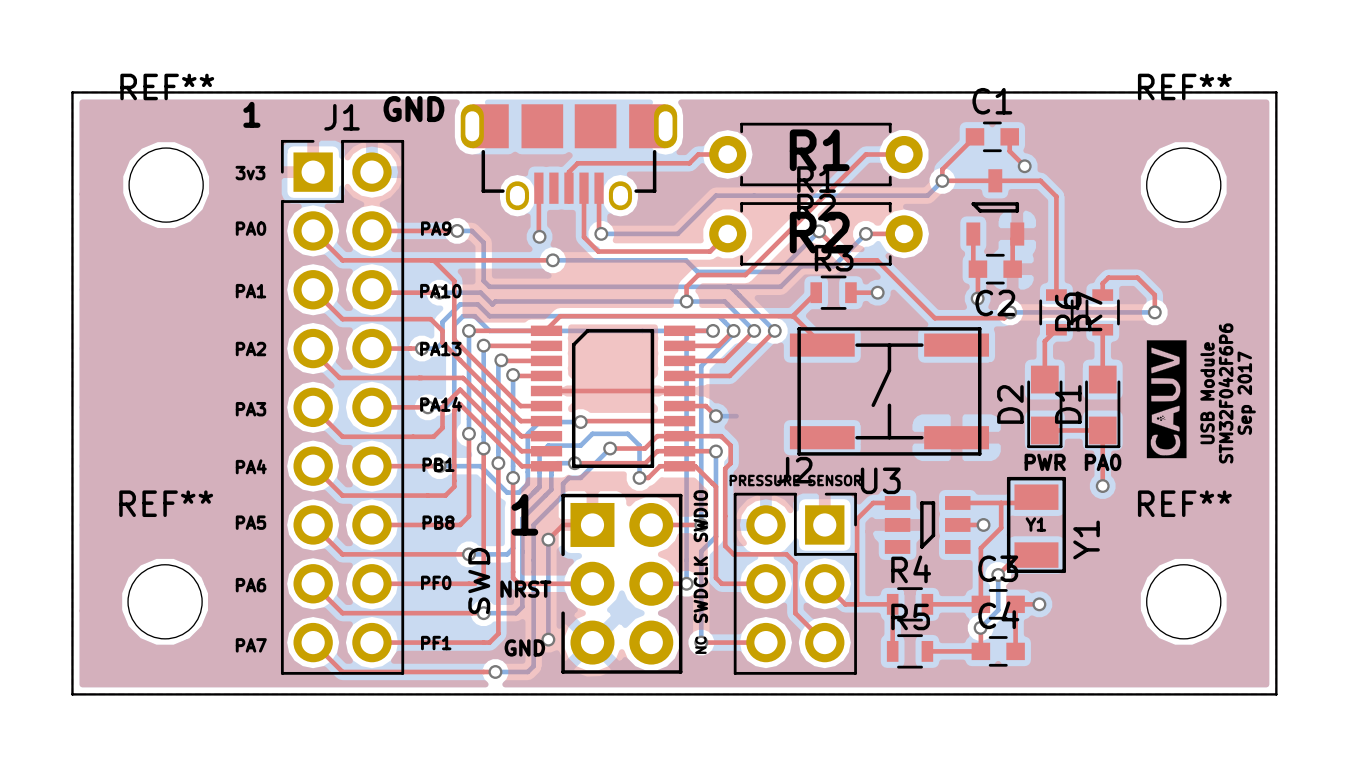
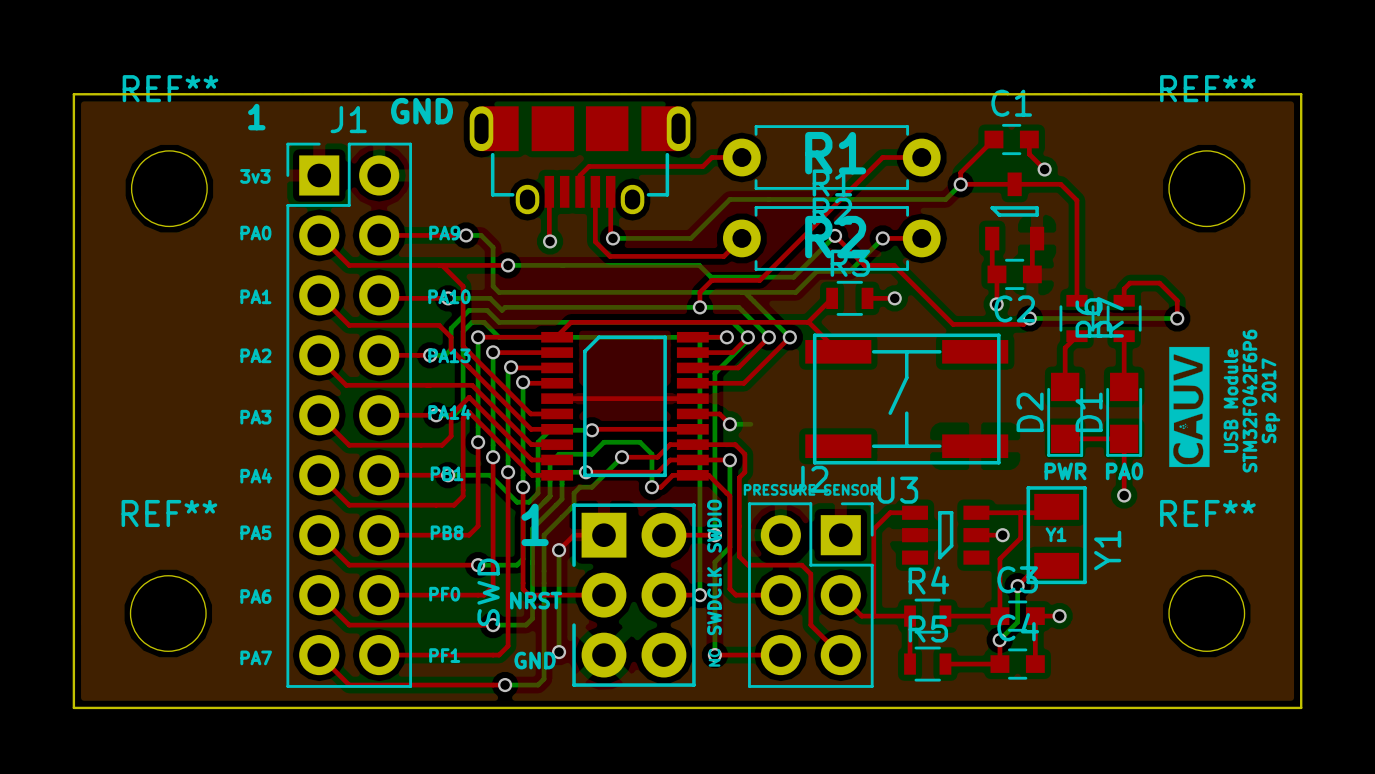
top track: (498, 260) (552, 260) -> none
bottom track: none -> (508, 265) (563, 265)
via position: (552, 260) -> (508, 265)

